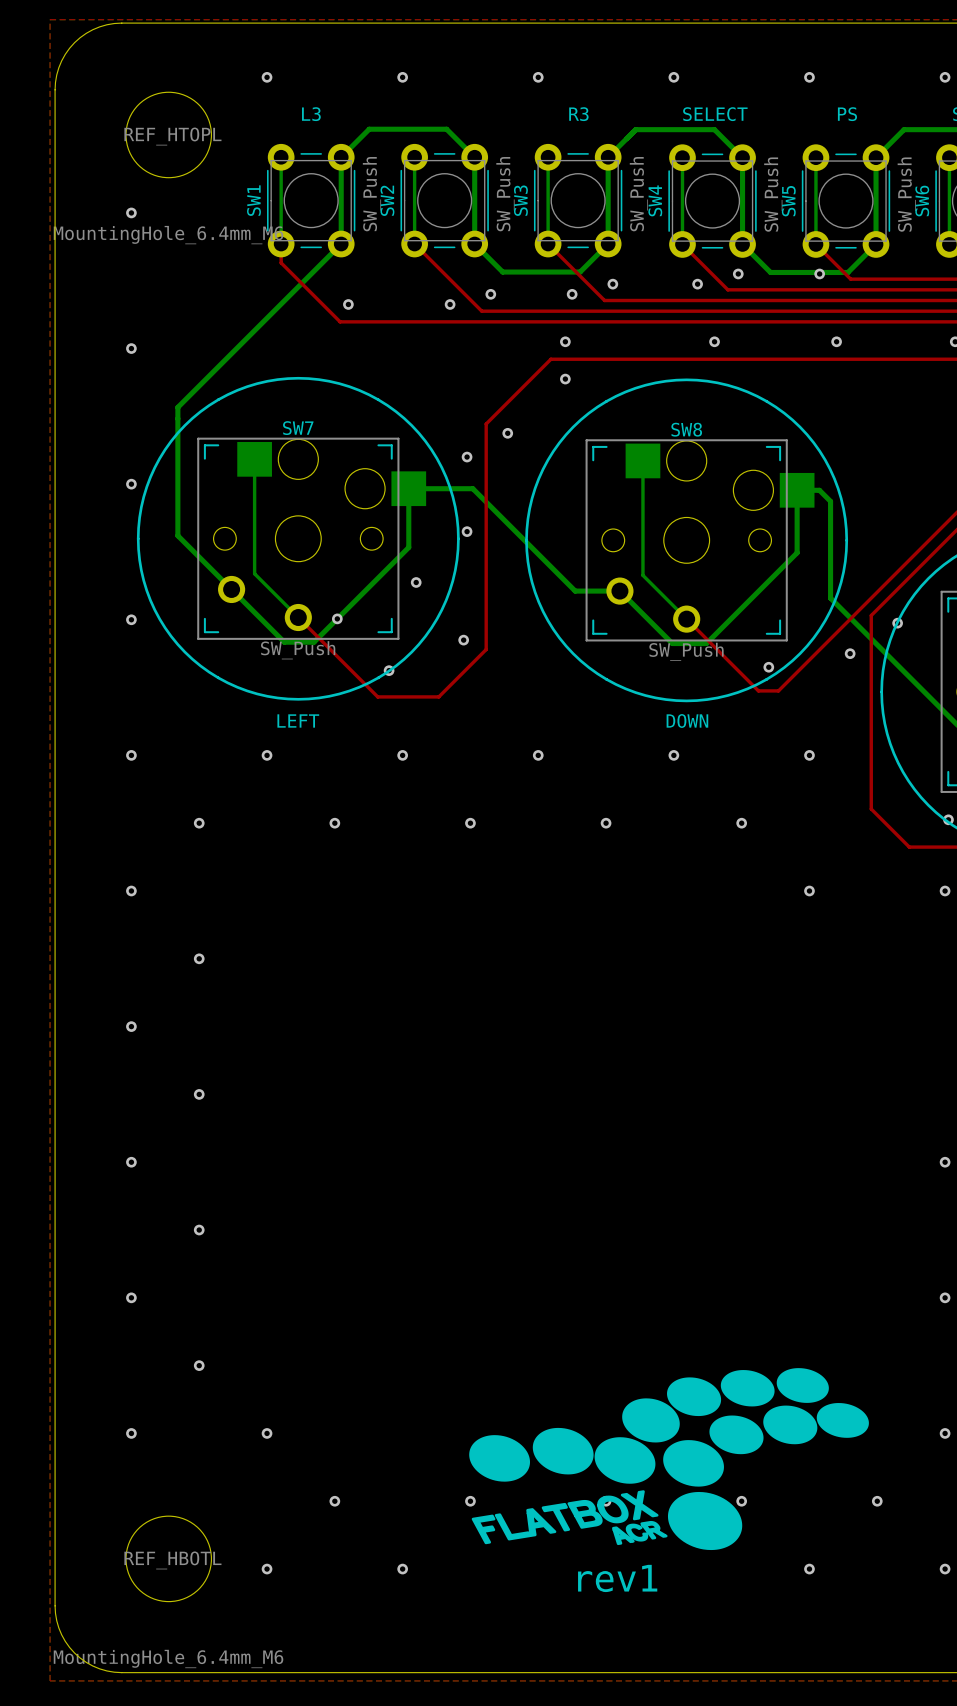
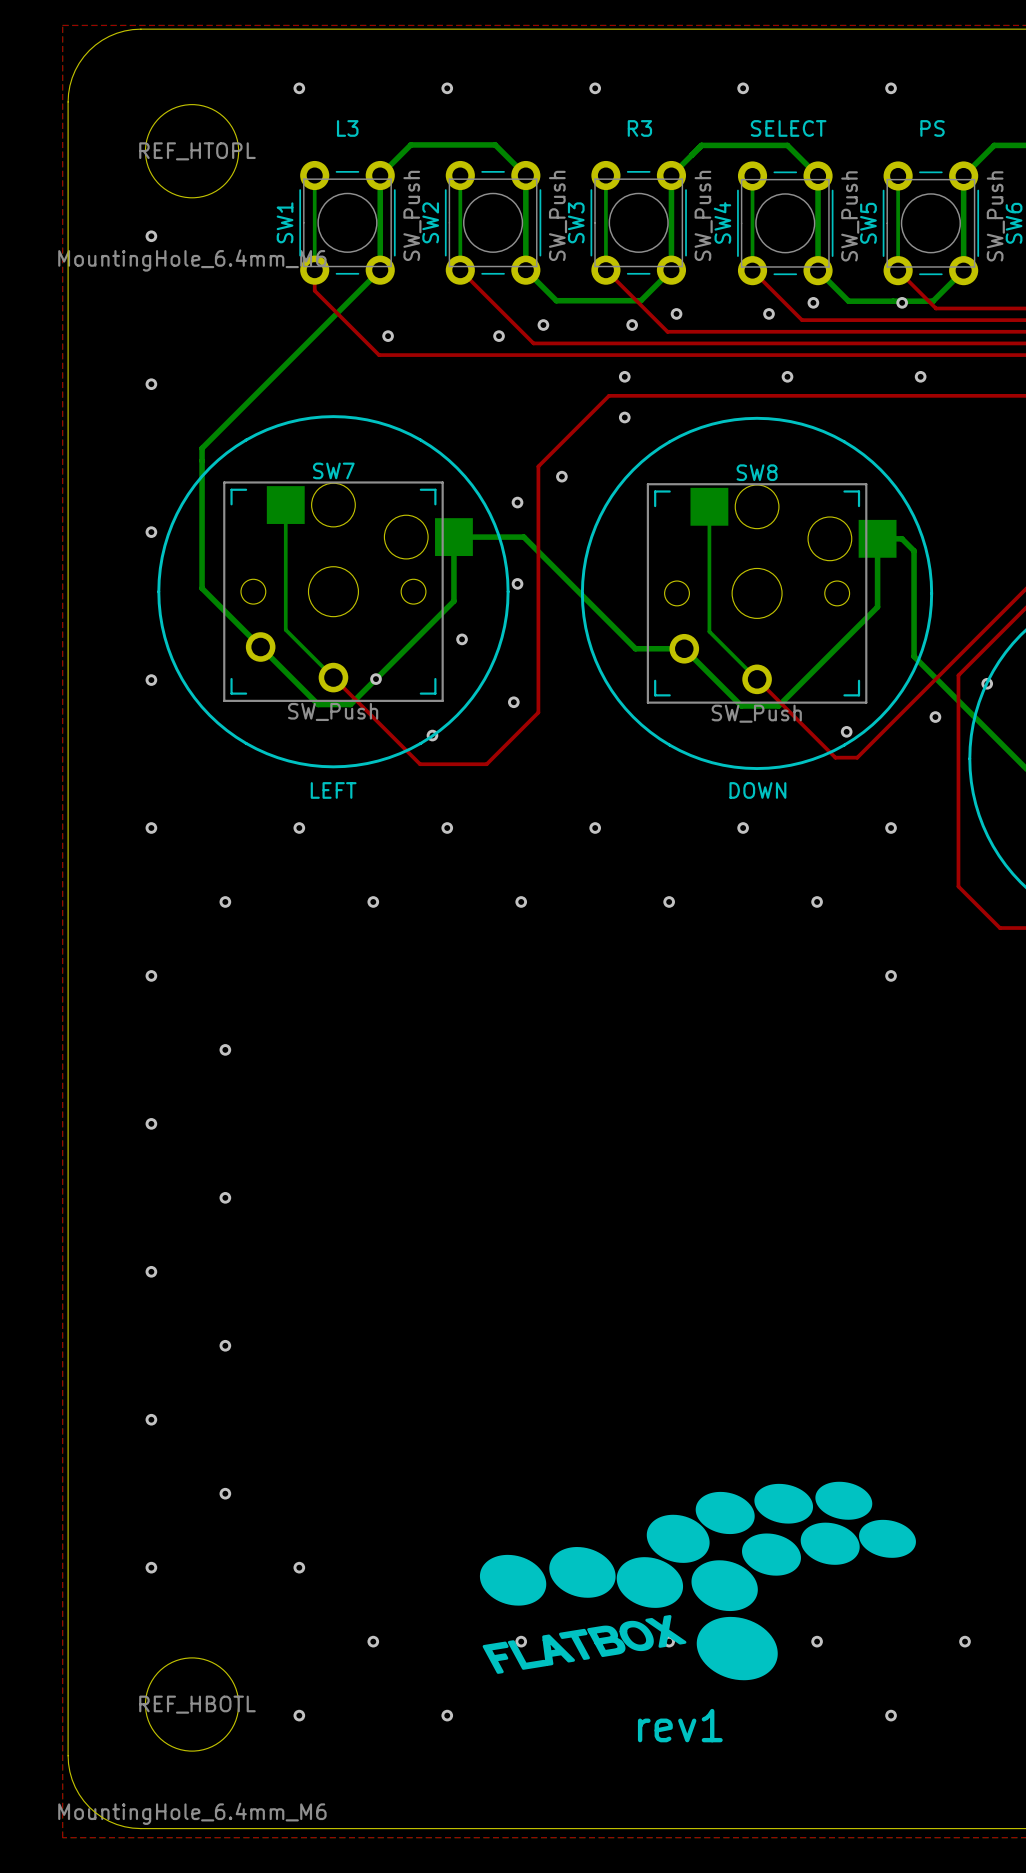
drawing: none -> [479, 1481, 916, 1612]
drawing: [469, 1368, 869, 1487] -> none
drawing position: (747, 1388) -> (783, 1503)
drawing position: (650, 1420) -> (678, 1538)
drawing position: (639, 1505) -> (665, 1631)
drawing position: (612, 1509) -> (636, 1635)
drawing position: (585, 1514) -> (606, 1641)
drawing position: (555, 1517) -> (574, 1644)
drawing: [612, 1520, 668, 1546] -> none
drawing position: (705, 1521) -> (737, 1648)
drawing position: (541, 1522) -> (558, 1650)
drawing position: (512, 1526) -> (527, 1655)
drawing position: (483, 1529) -> (495, 1657)

